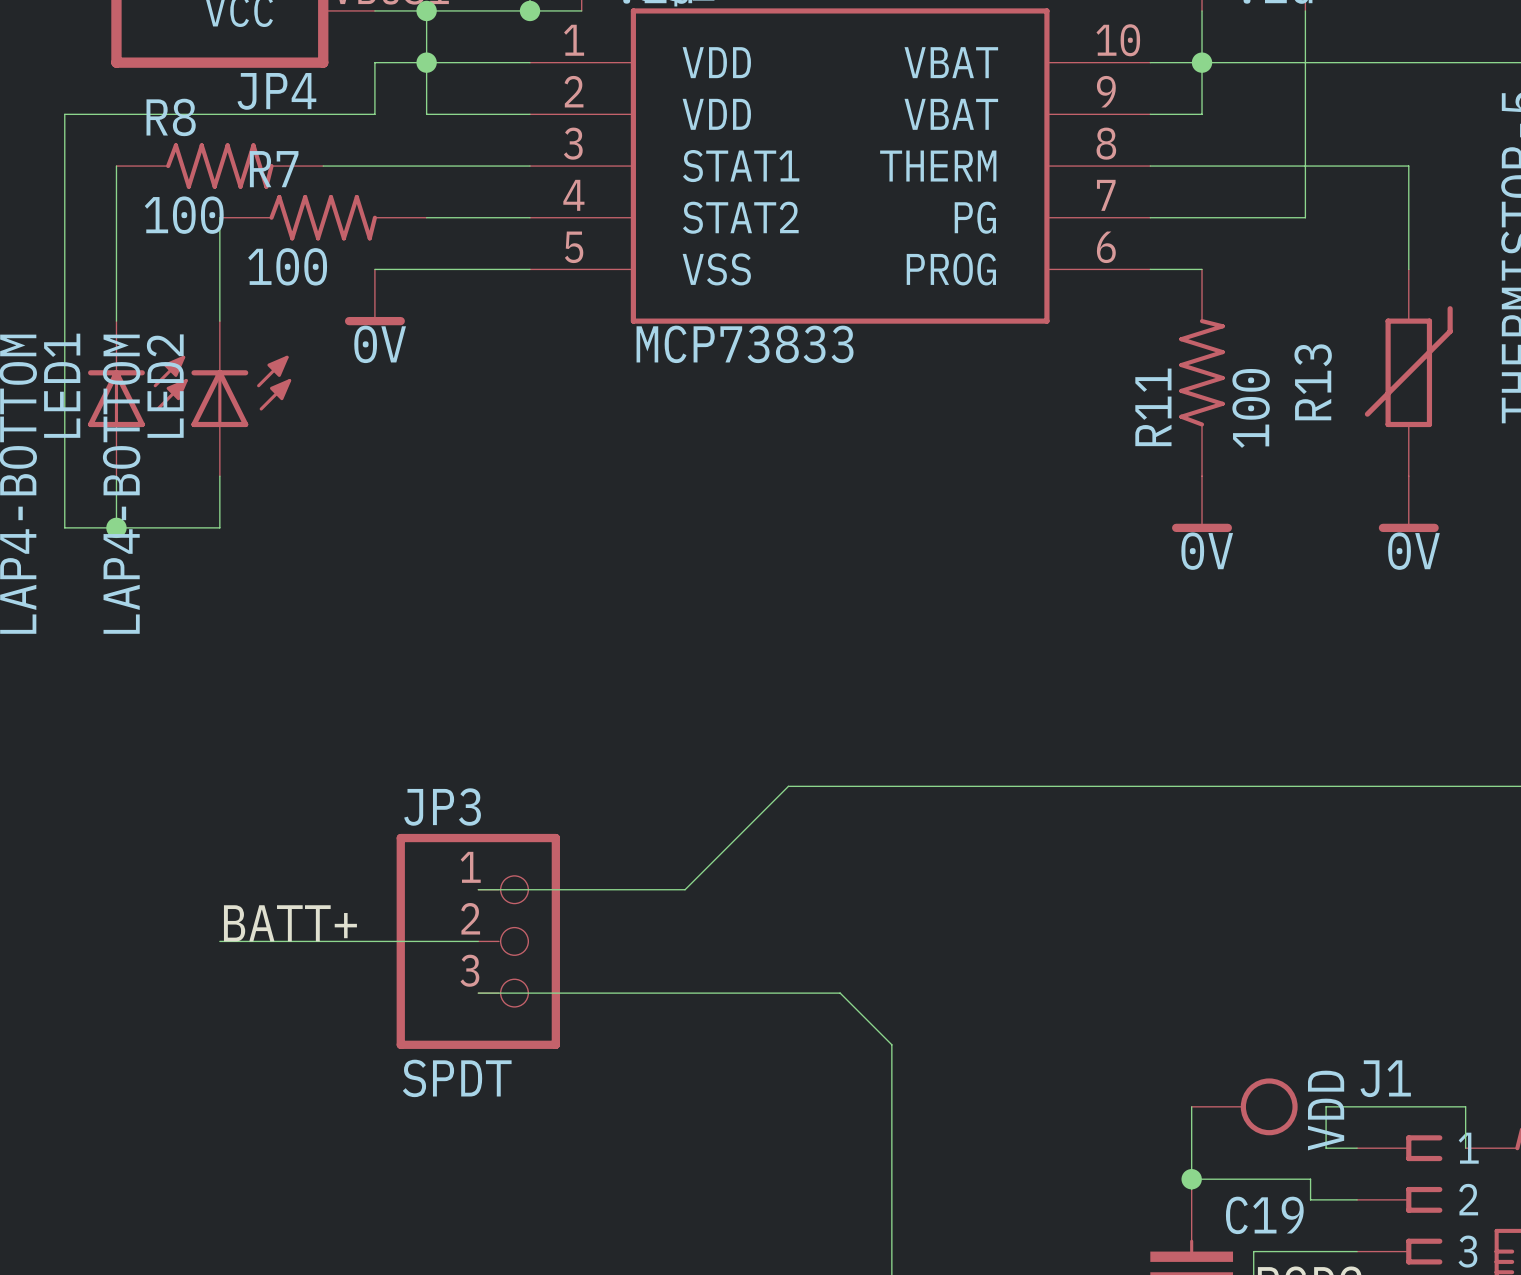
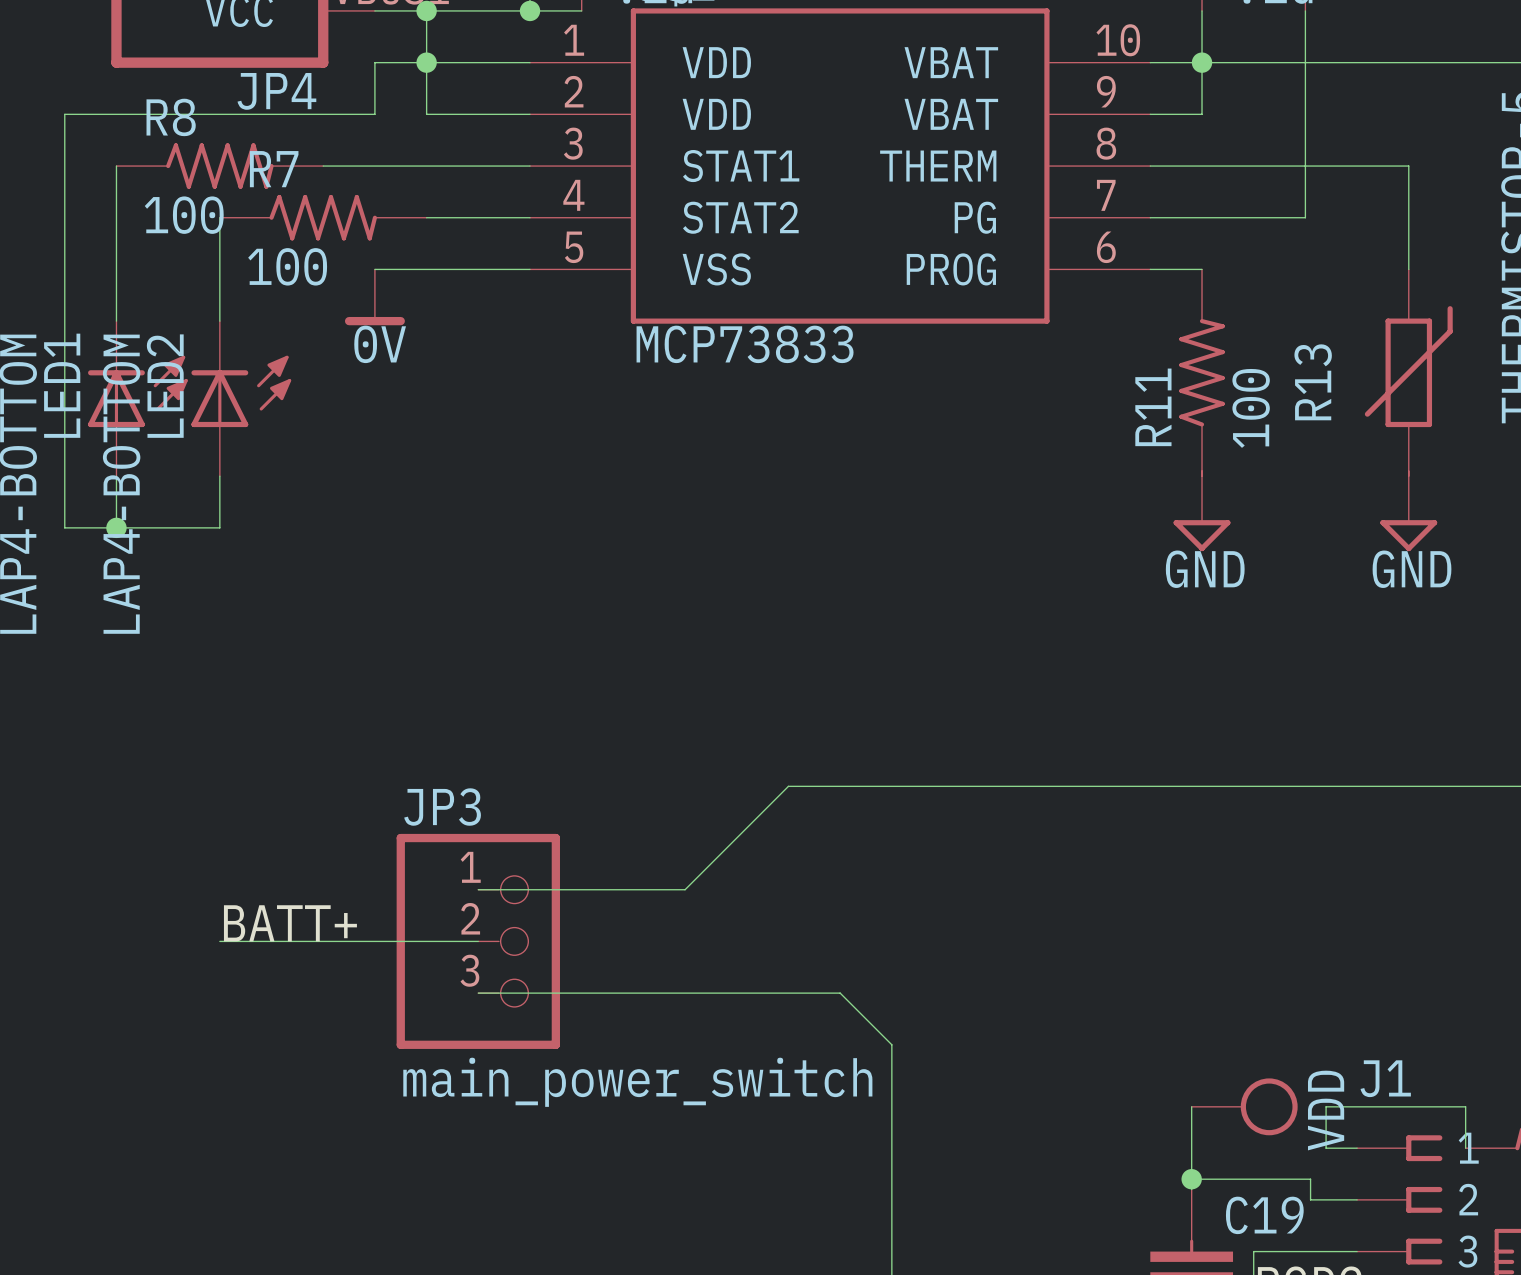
power symbol: 0V (1202, 504) -> GND (1202, 511)
power symbol: 0V (1408, 504) -> GND (1408, 511)
JP3 value: SPDT (457, 1078) -> main_power_switch (637, 1082)

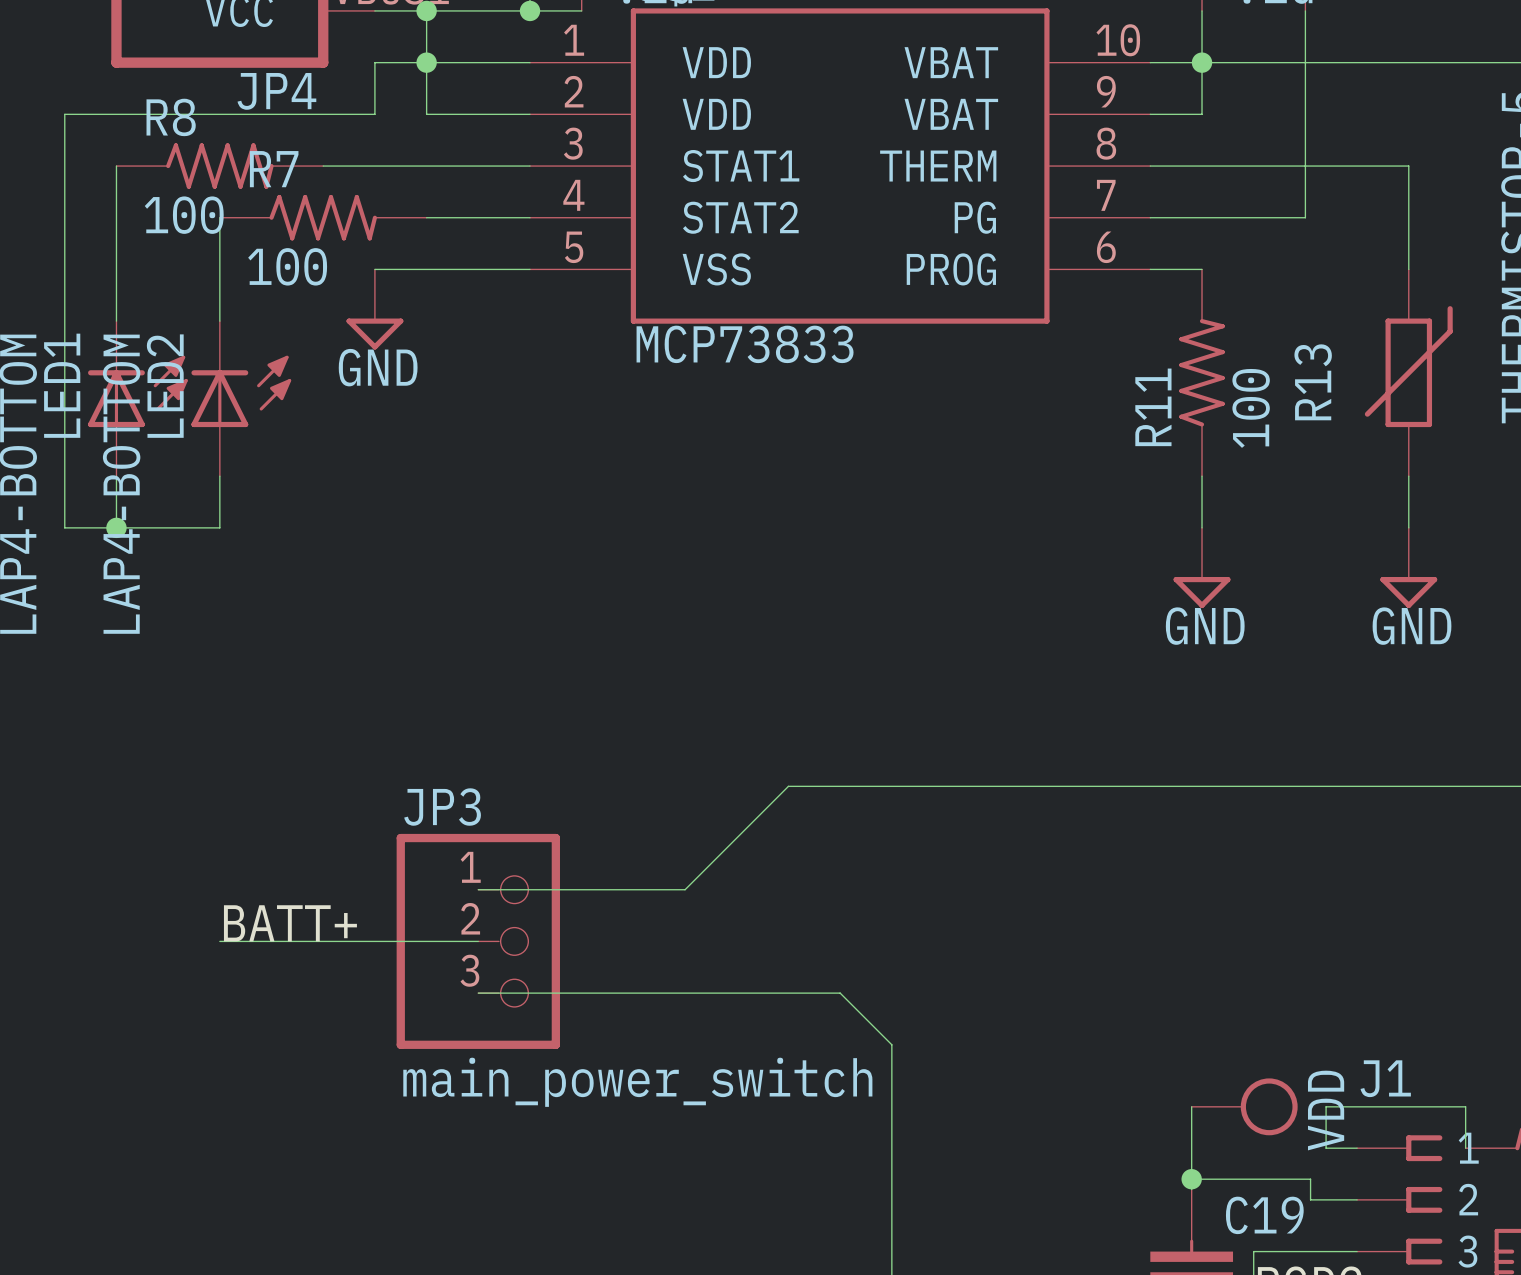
power symbol: 0V (374, 297) -> GND (374, 309)
power symbol position: GND (1202, 511) -> GND (1202, 567)
power symbol position: GND (1408, 511) -> GND (1408, 567)

